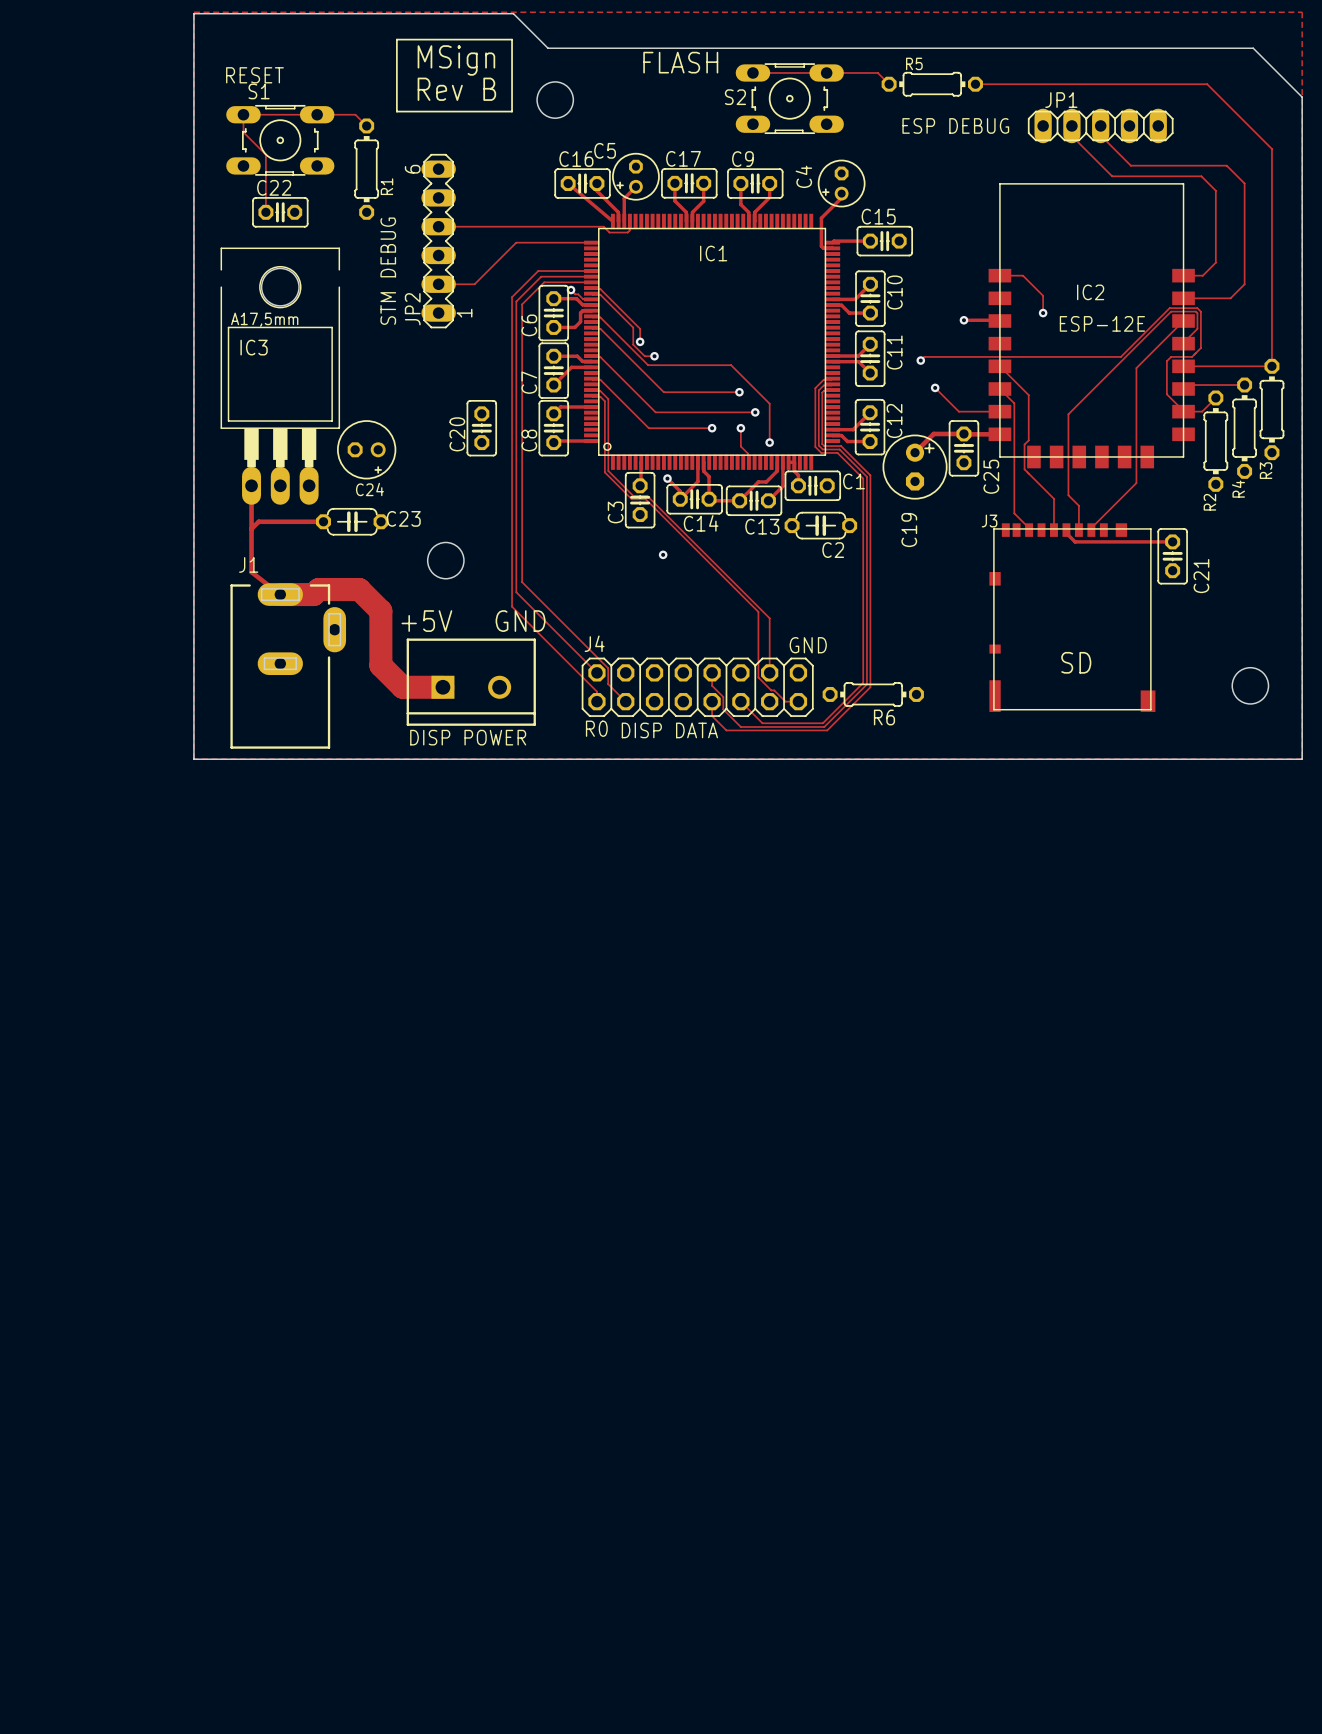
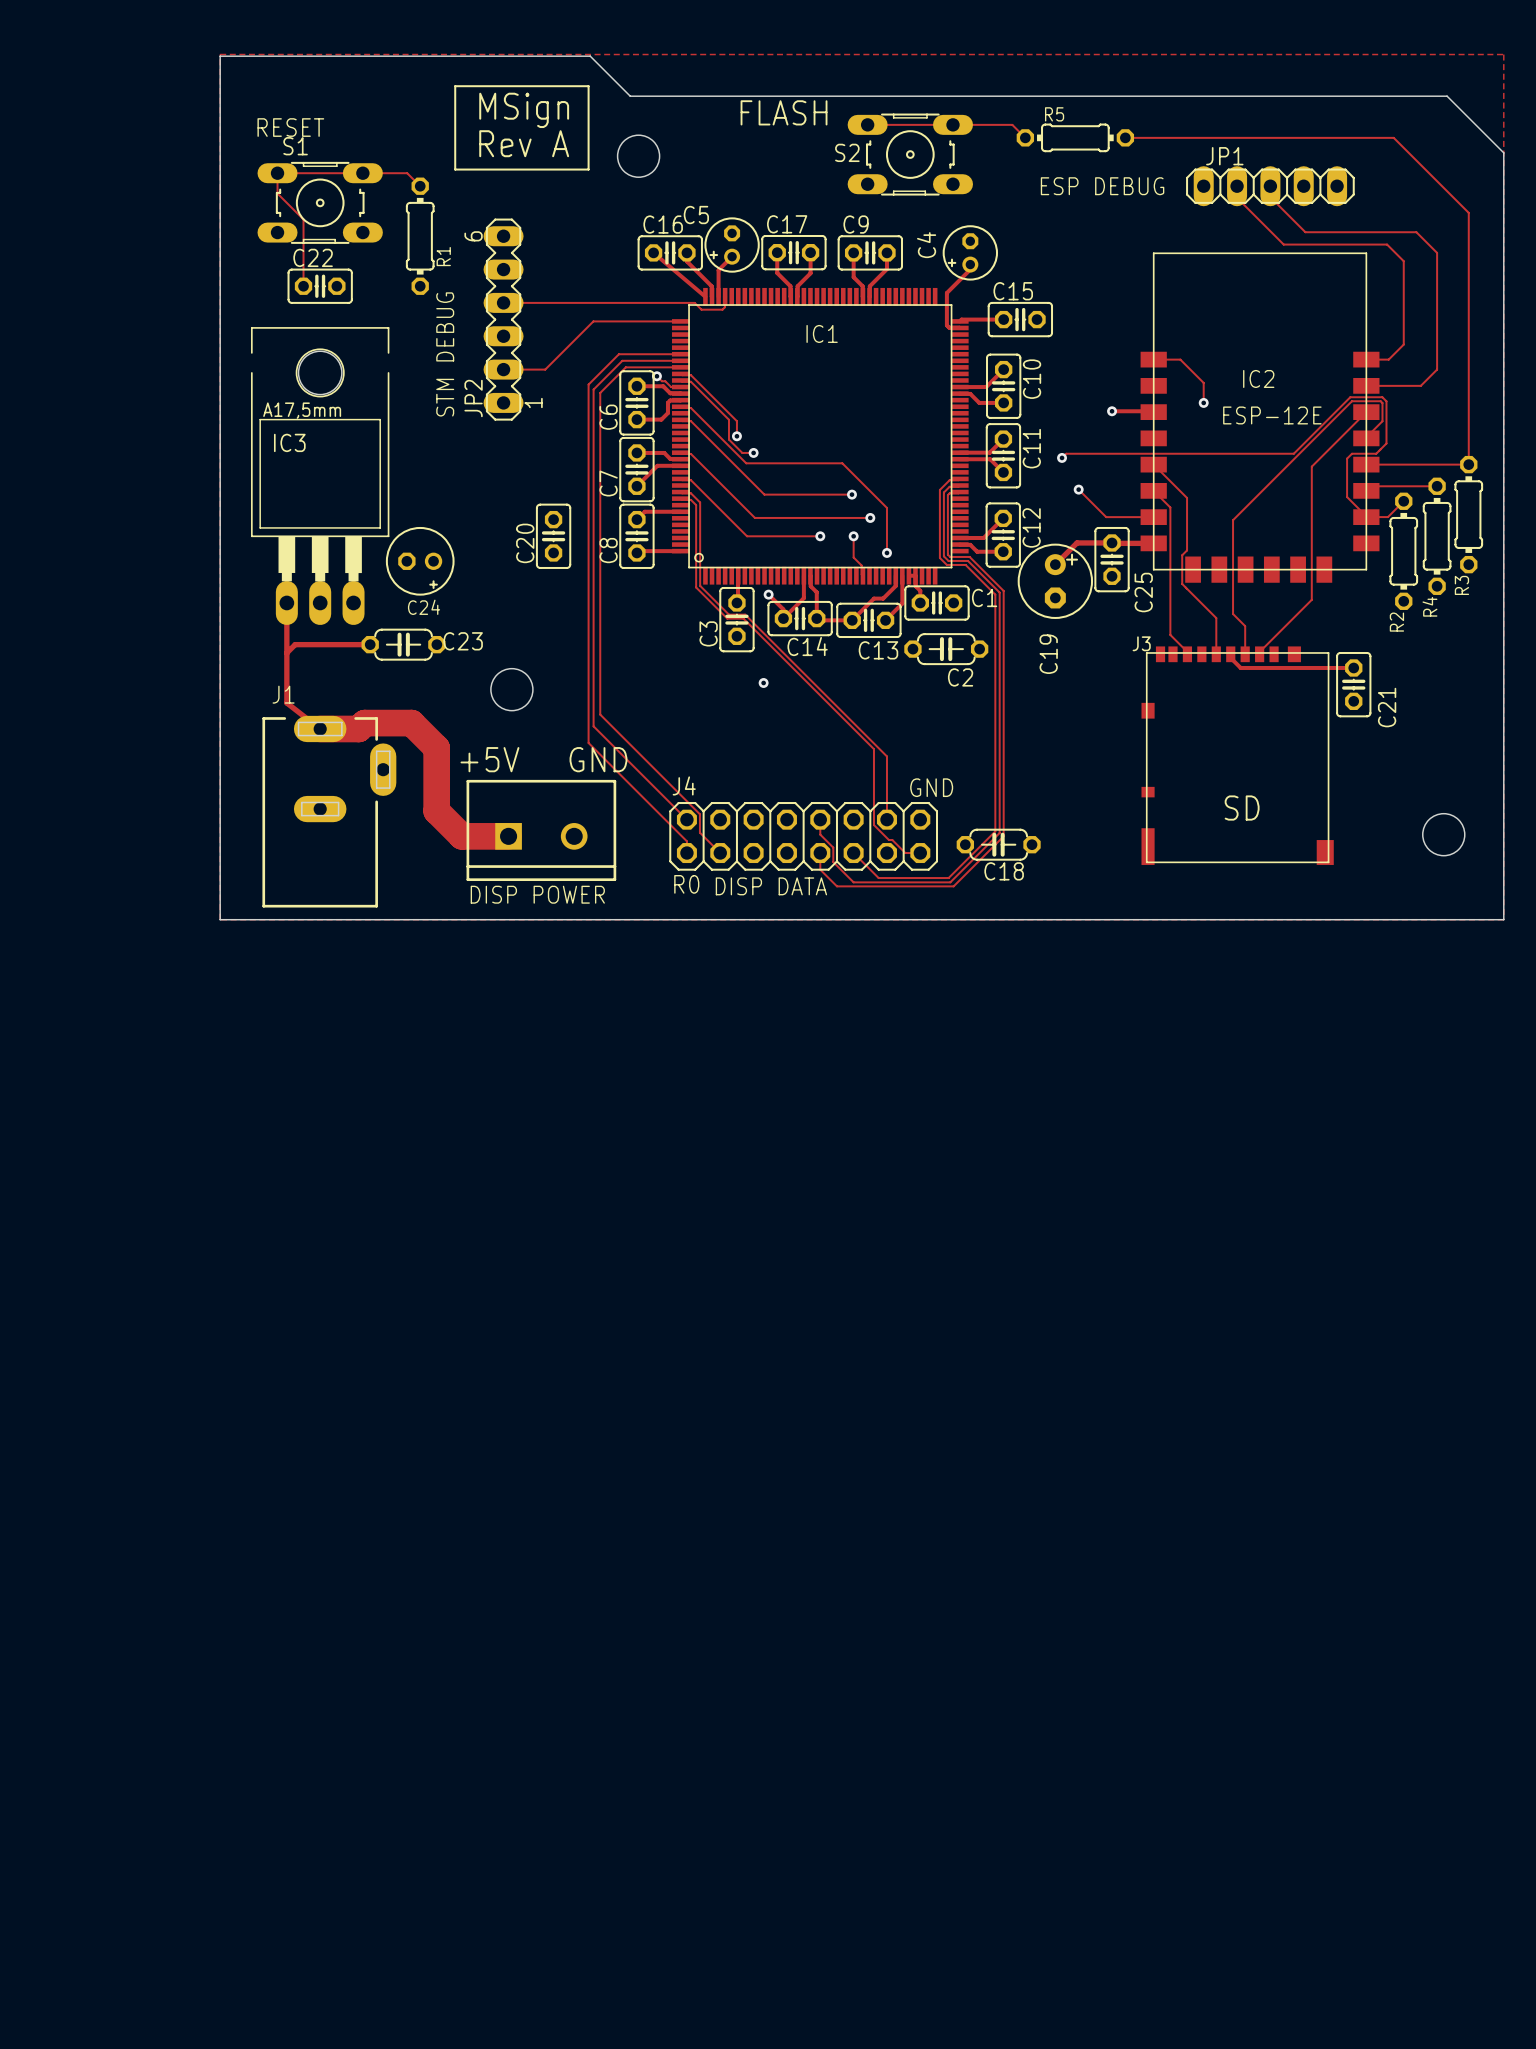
text: Rev B (456, 89) -> Rev A (524, 143)
C18: none -> (998, 844)
R6: (873, 694) -> none

